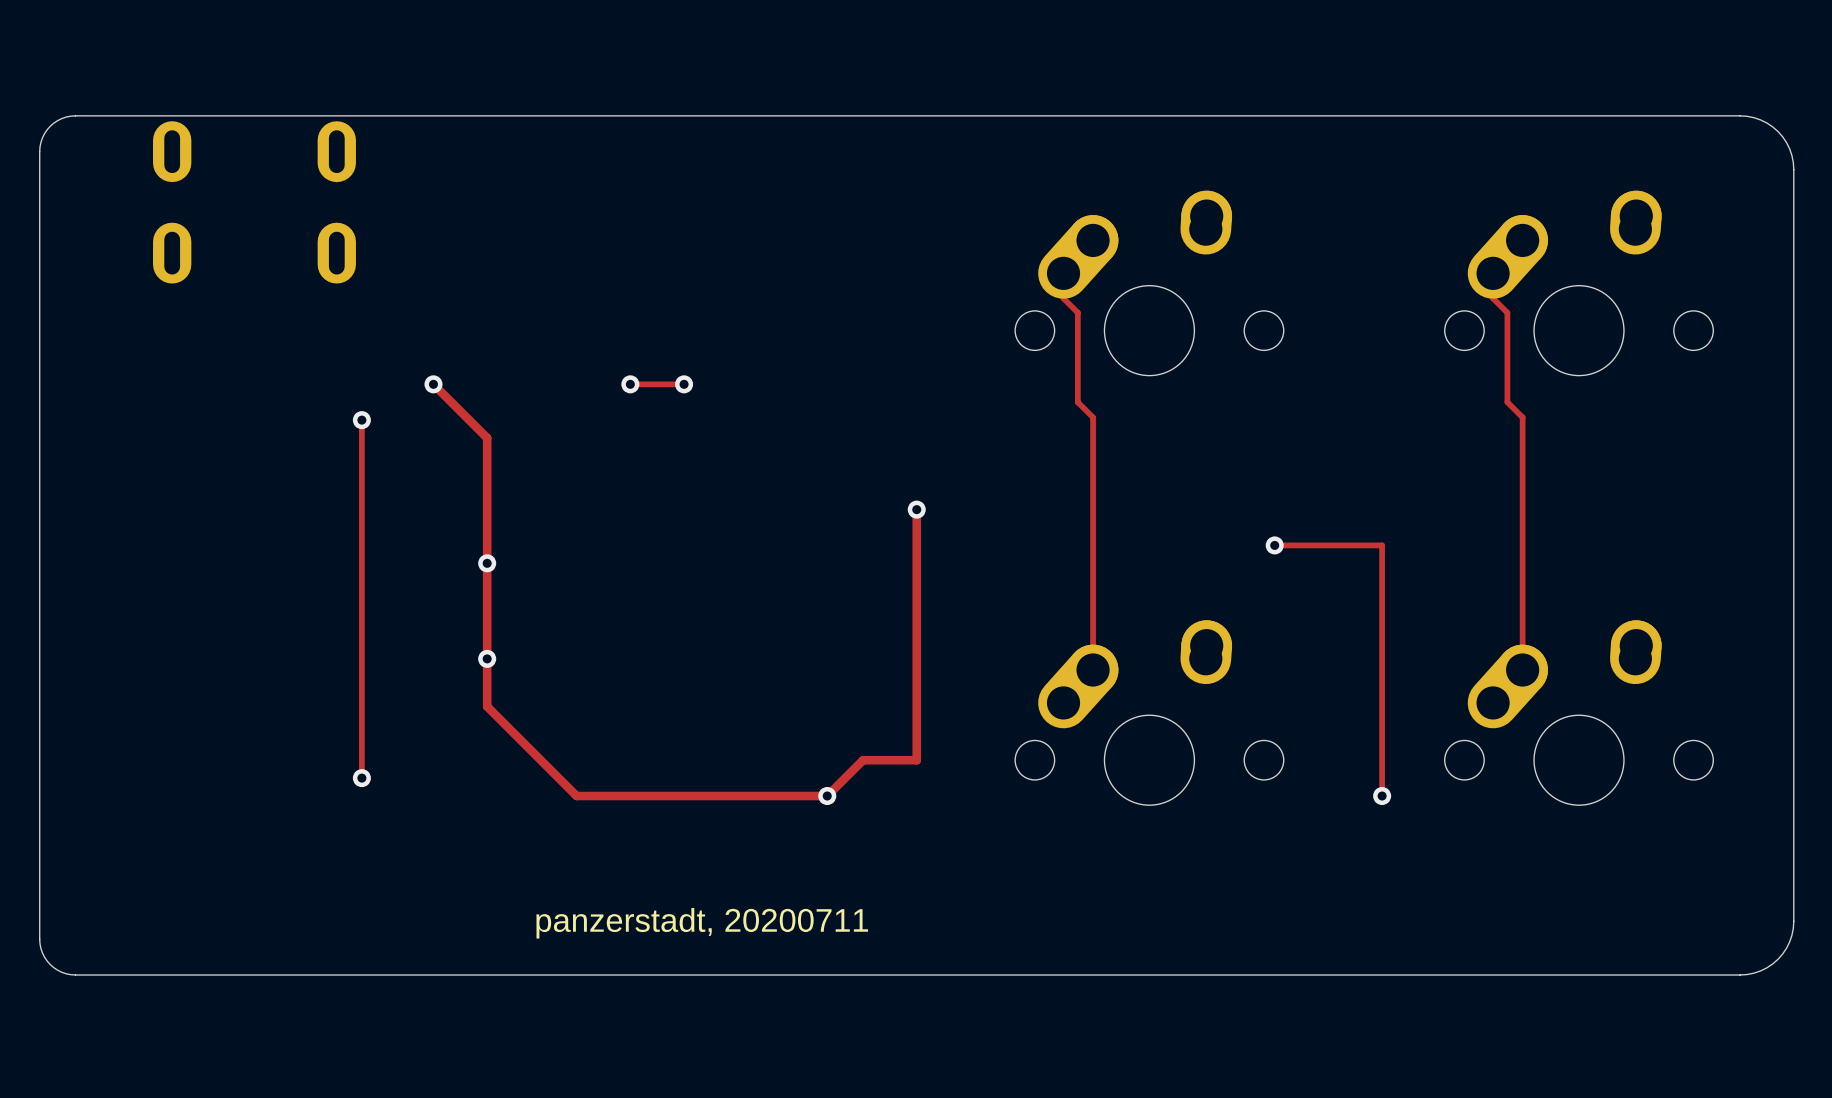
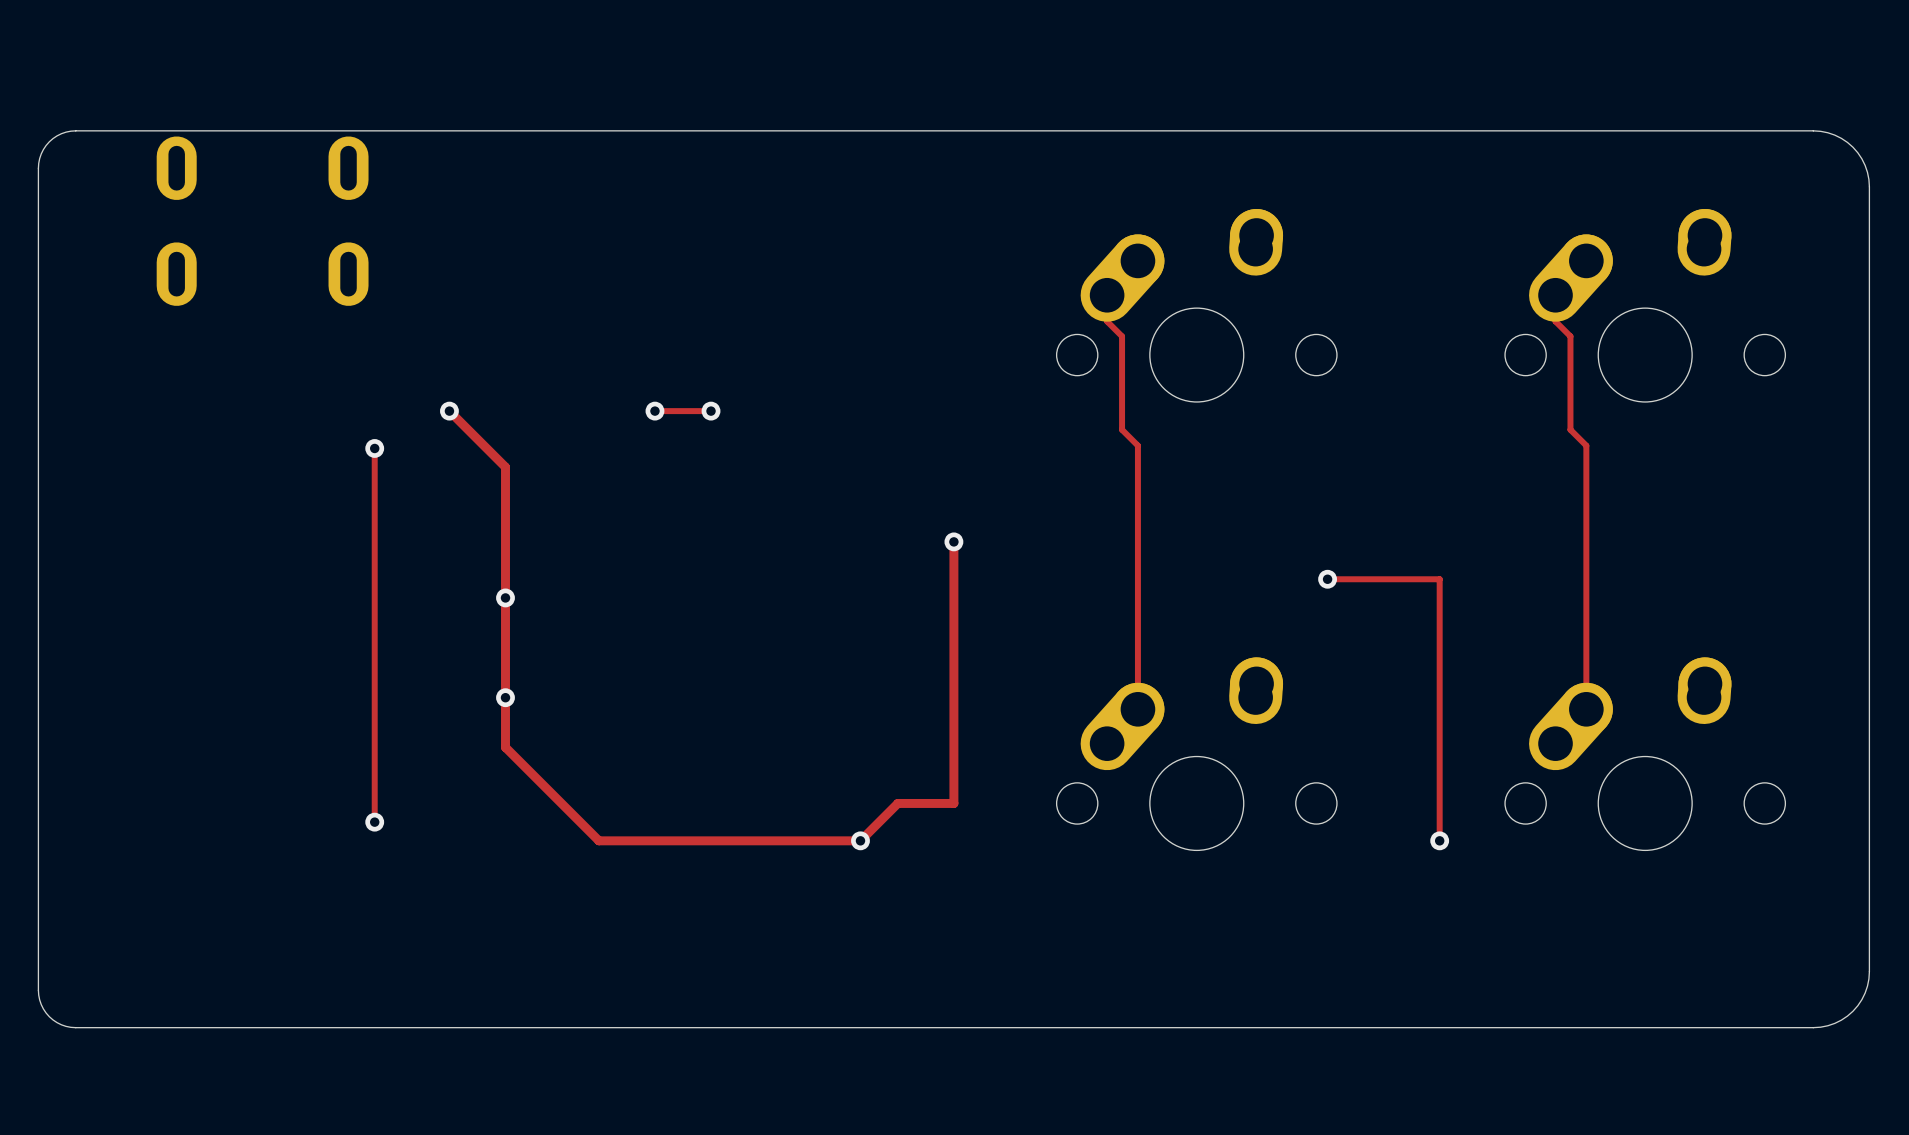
text: panzerstadt, 20200711 (702, 923) -> none

